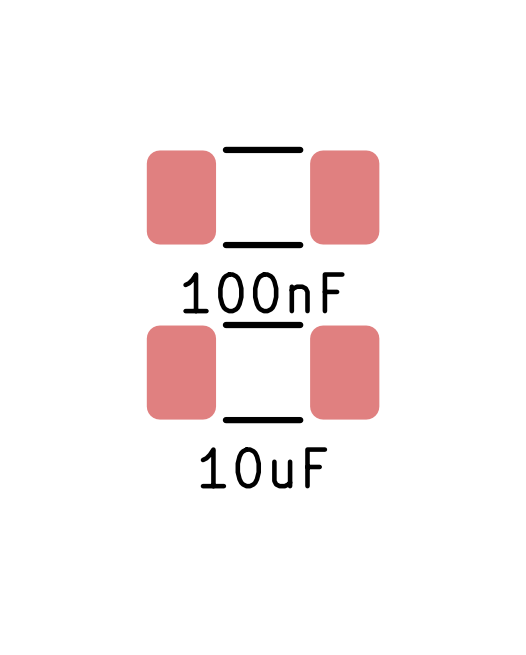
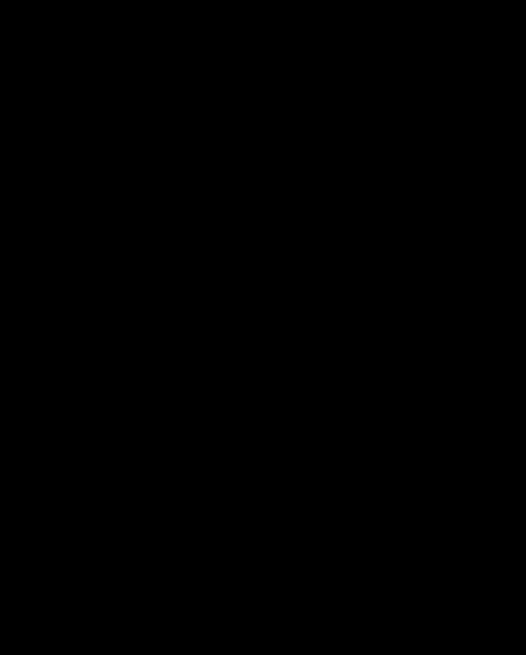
part: 100nF (263, 197) -> none
part: 10uF (263, 372) -> none

